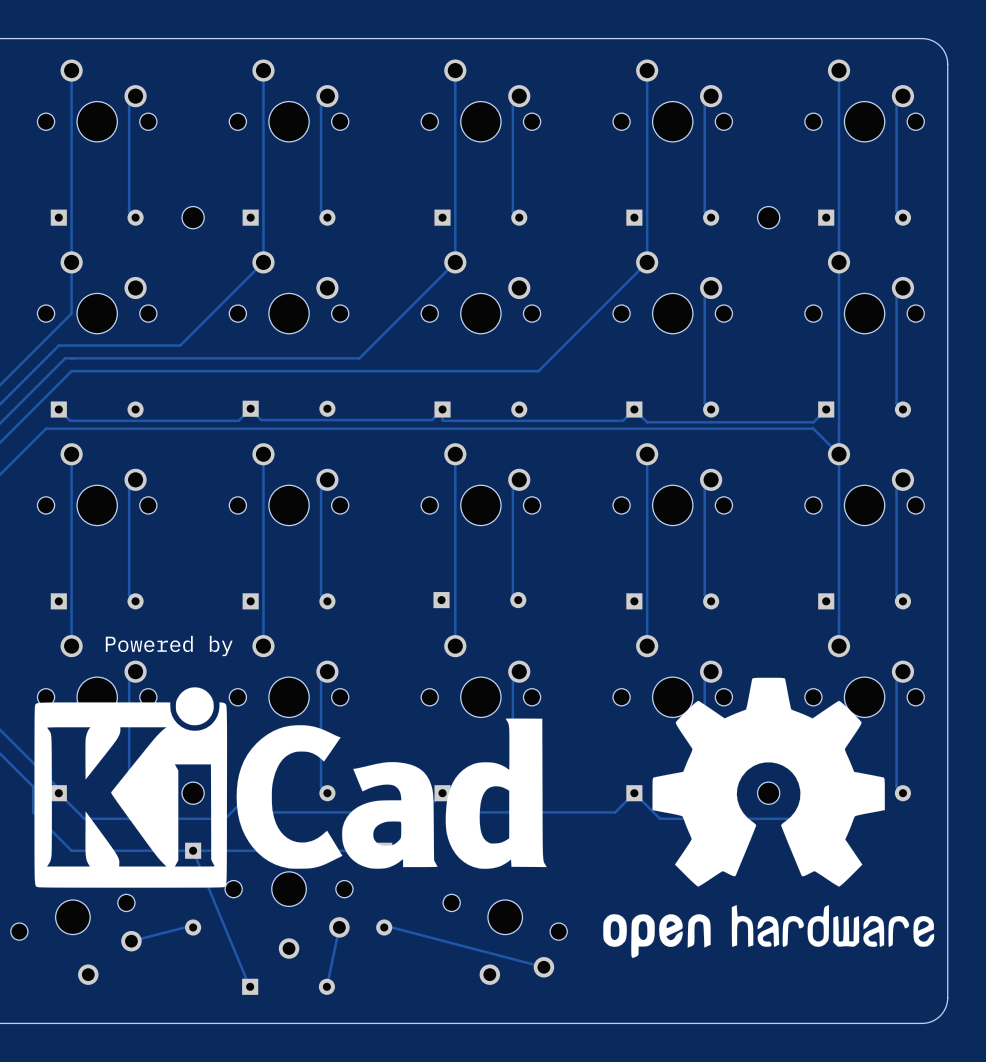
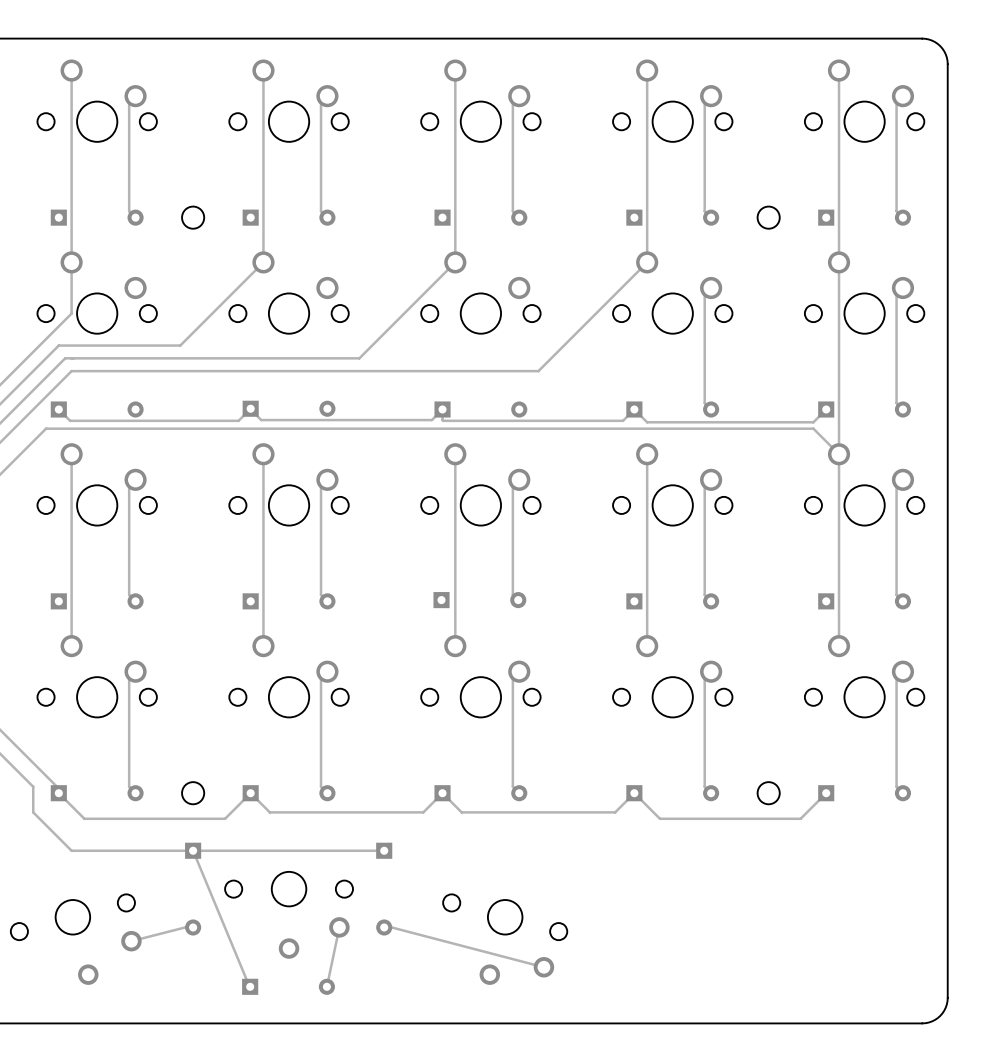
text: Powered by (169, 645) -> none
drawing: [603, 677, 935, 958] -> none
drawing: [34, 687, 547, 888] -> none

